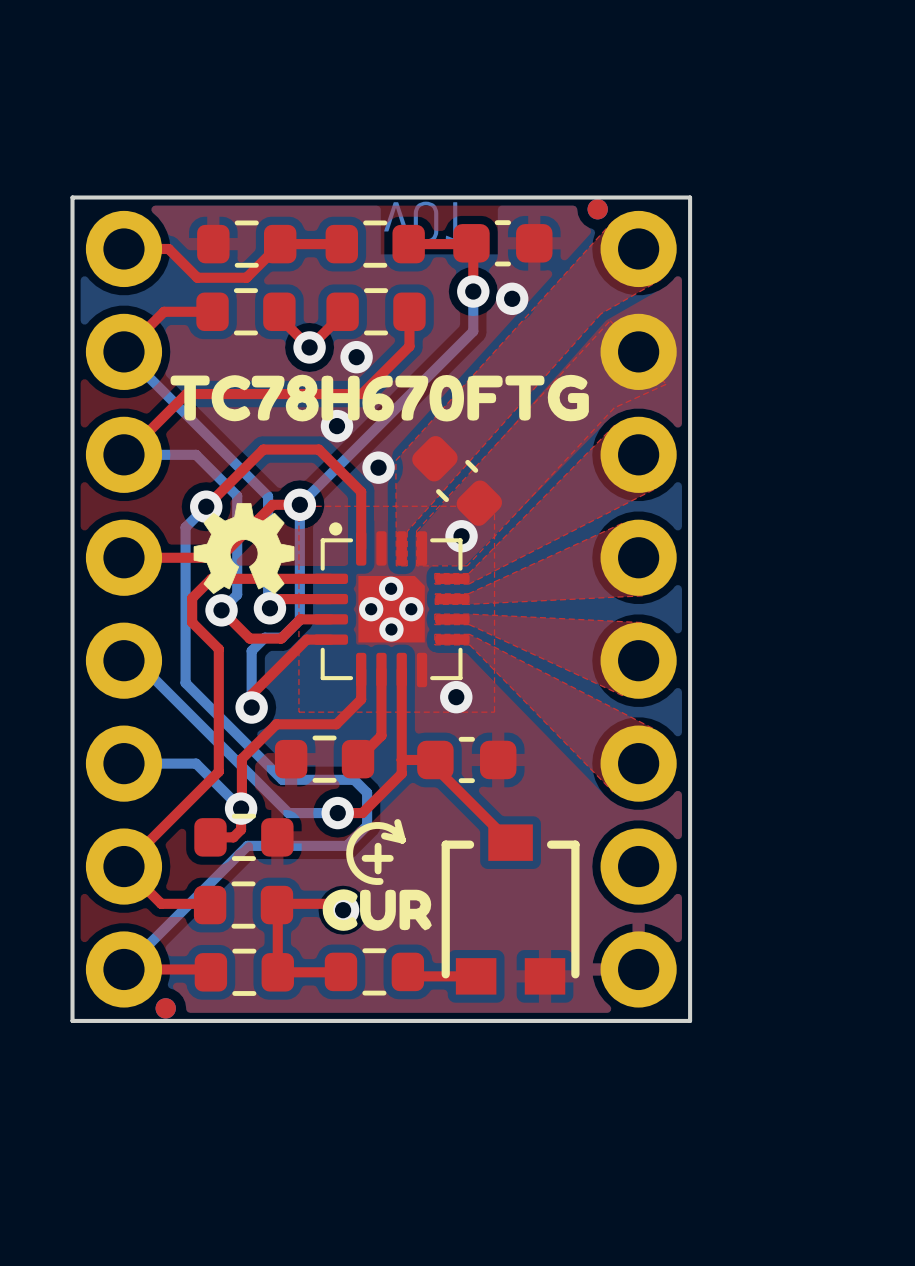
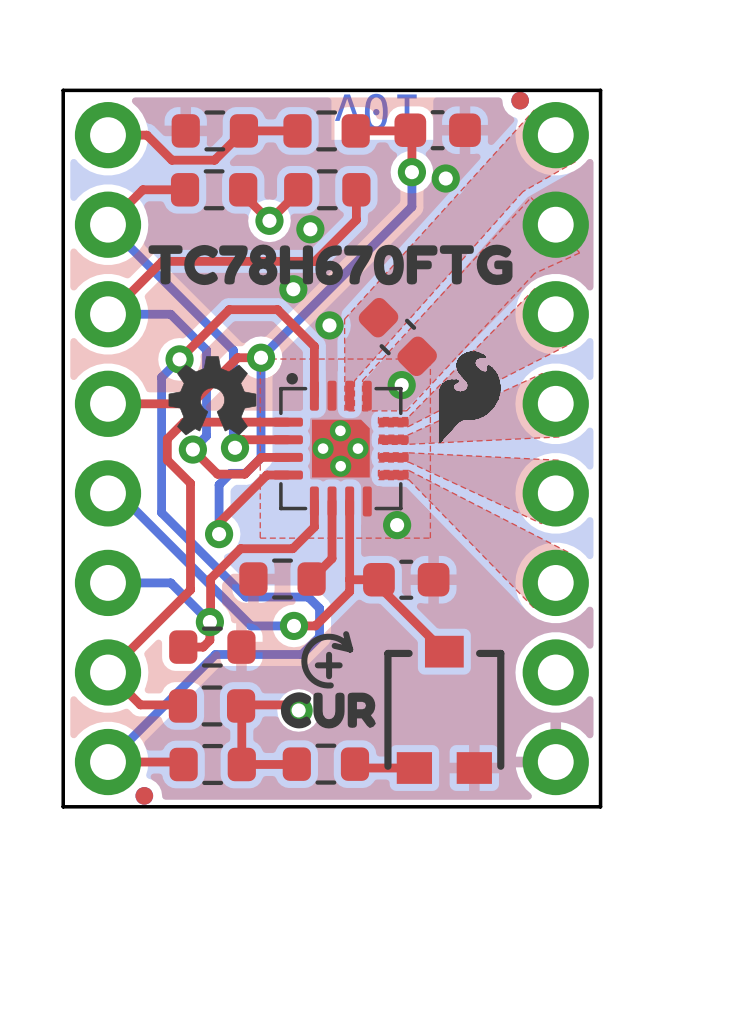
drawing: none -> [438, 351, 501, 443]

